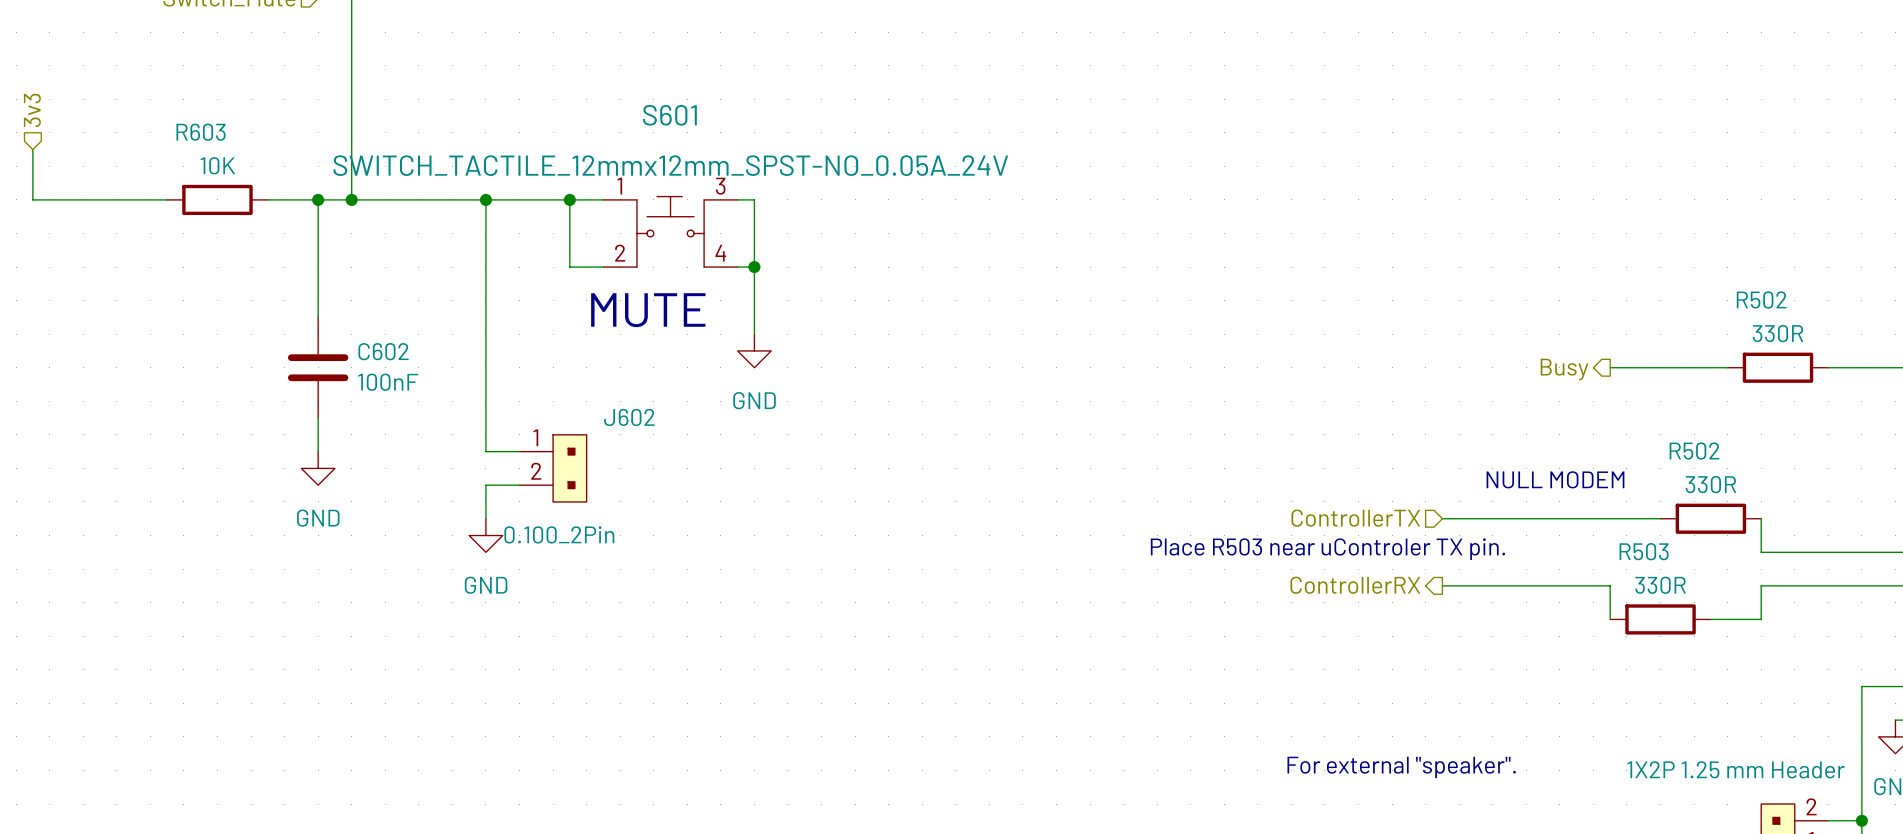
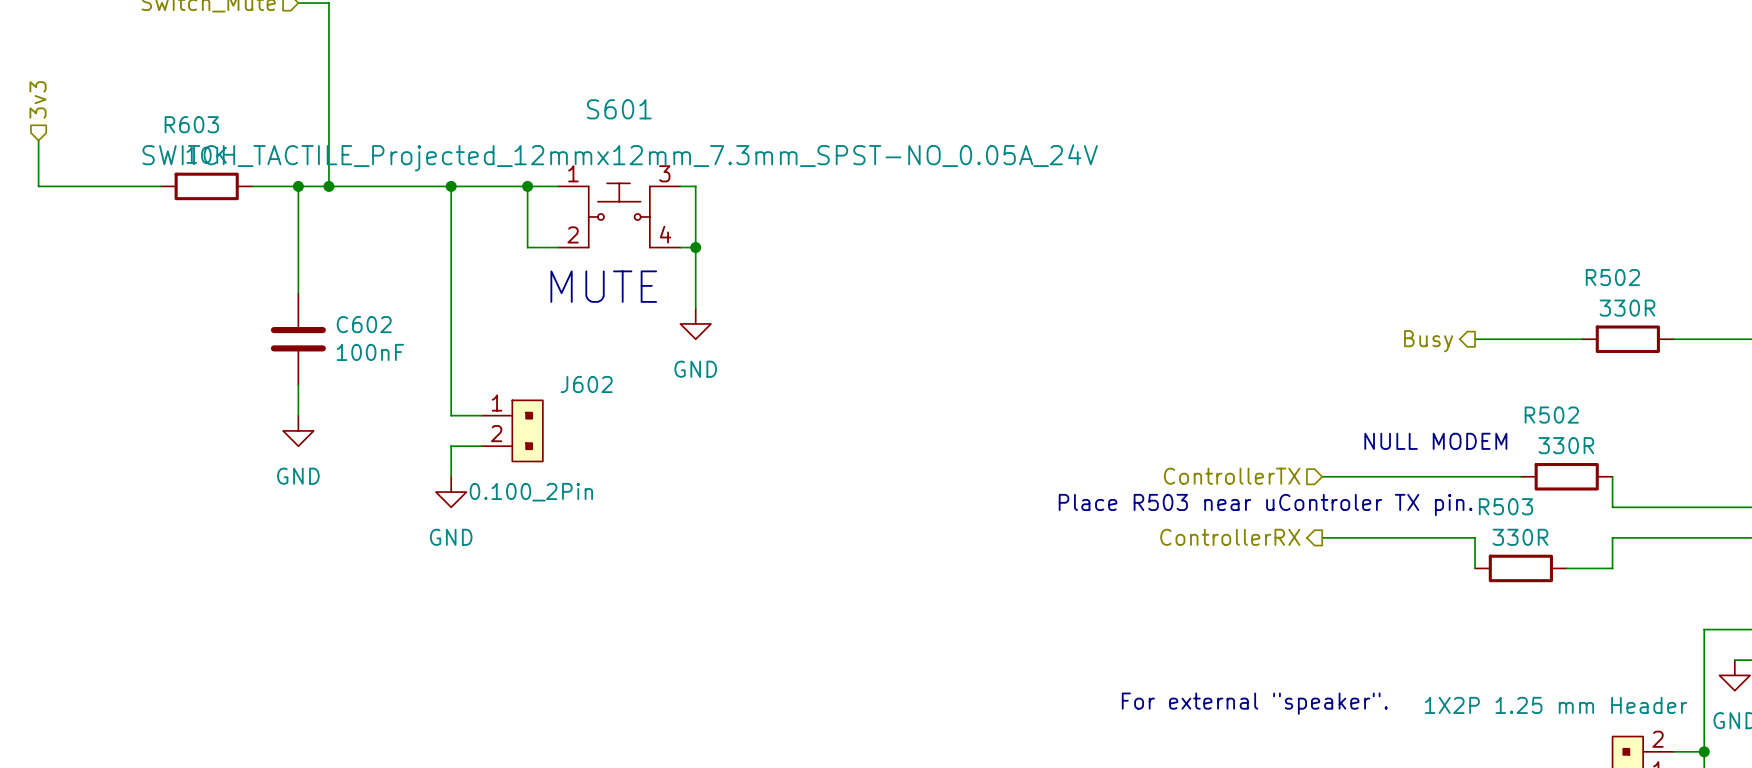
S601 value: SWITCH_TACTILE_12mmx12mm_SPST-NO_0.05A_24V (670, 165) -> SWITCH_TACTILE_Projected_12mmx12mm_7.3mm_SPST-NO_0.05A_24V (620, 157)

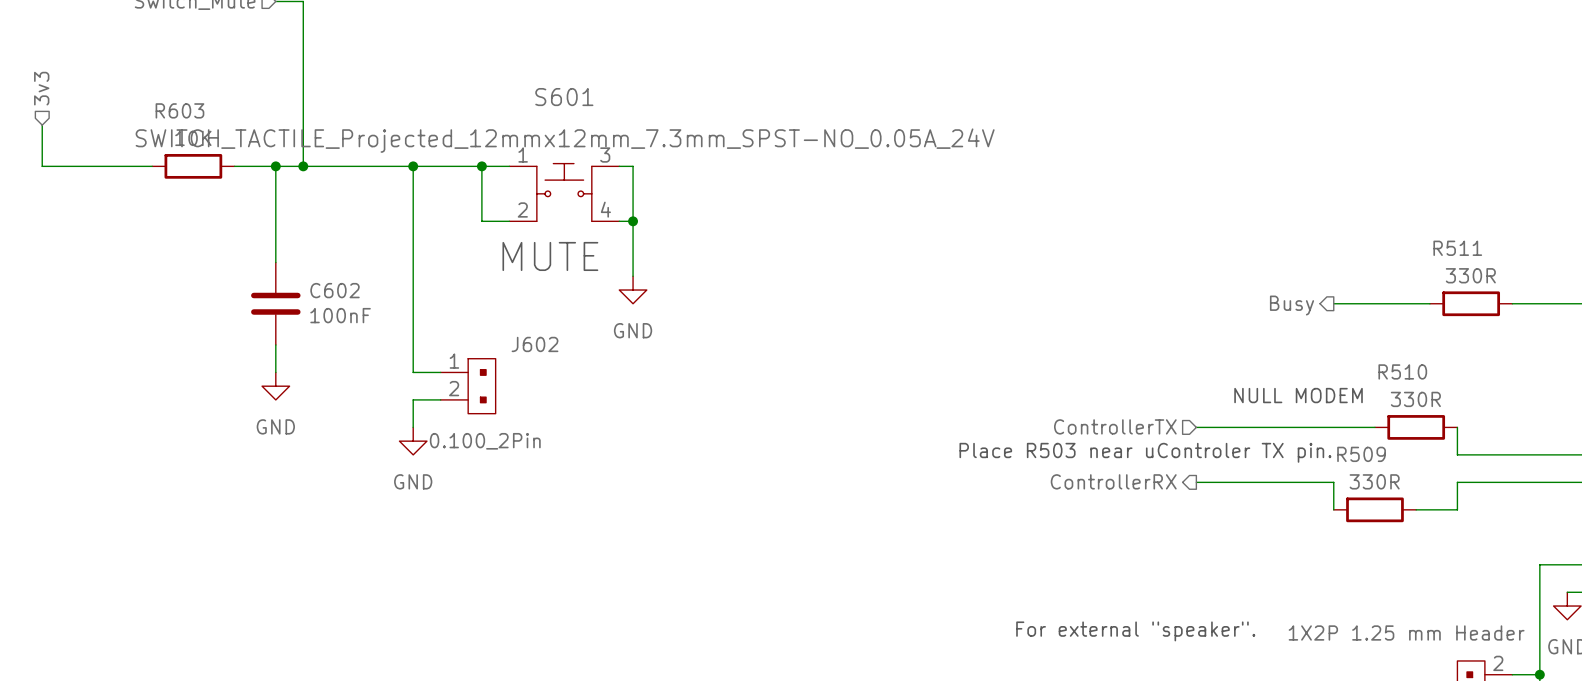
R502 name: R502 (1612, 277) -> R511 (1457, 248)
R502 name: R502 (1551, 415) -> R510 (1402, 371)
R503 name: R503 (1505, 506) -> R509 (1361, 454)

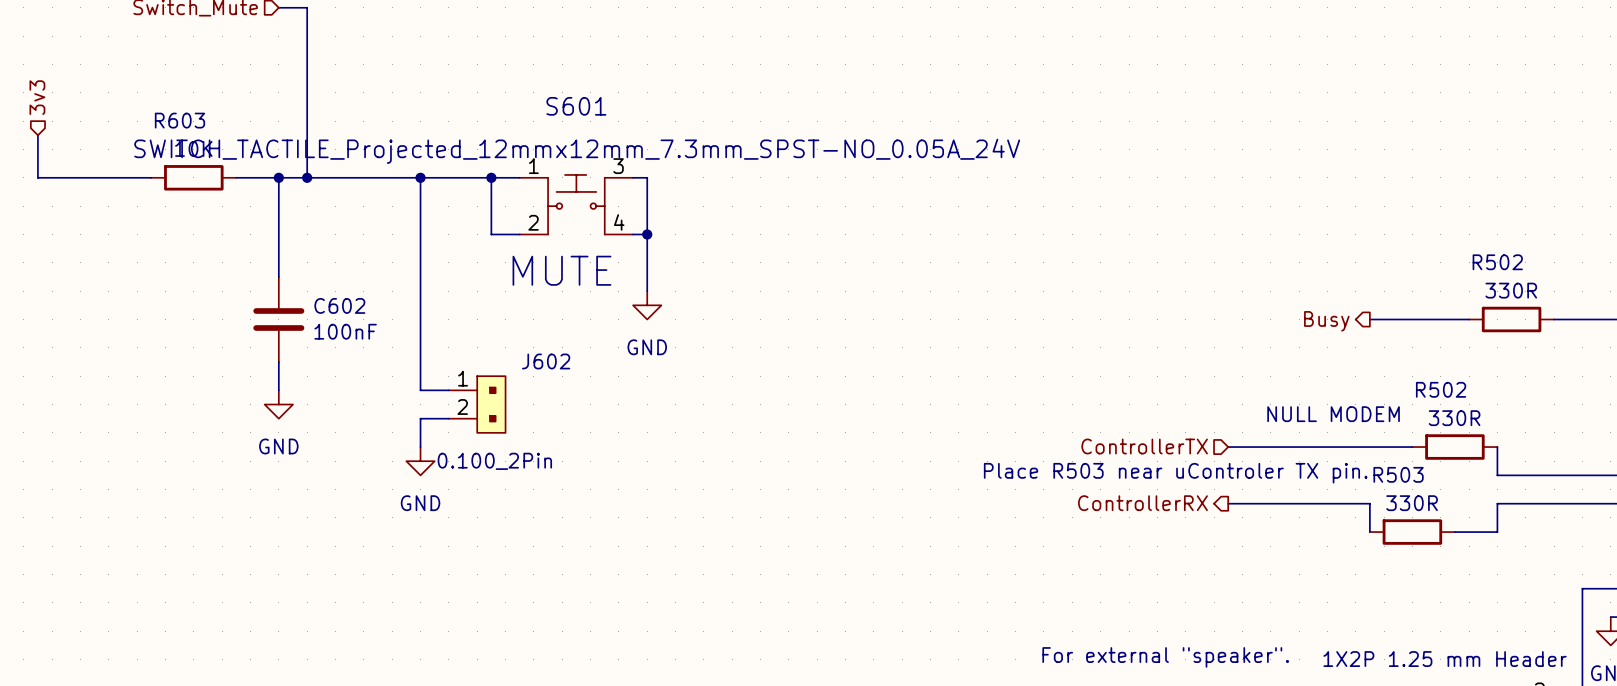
R511 name: R511 (1457, 248) -> R502 (1497, 262)
R510 name: R510 (1402, 371) -> R502 (1441, 389)
R509 name: R509 (1361, 454) -> R503 (1398, 474)

